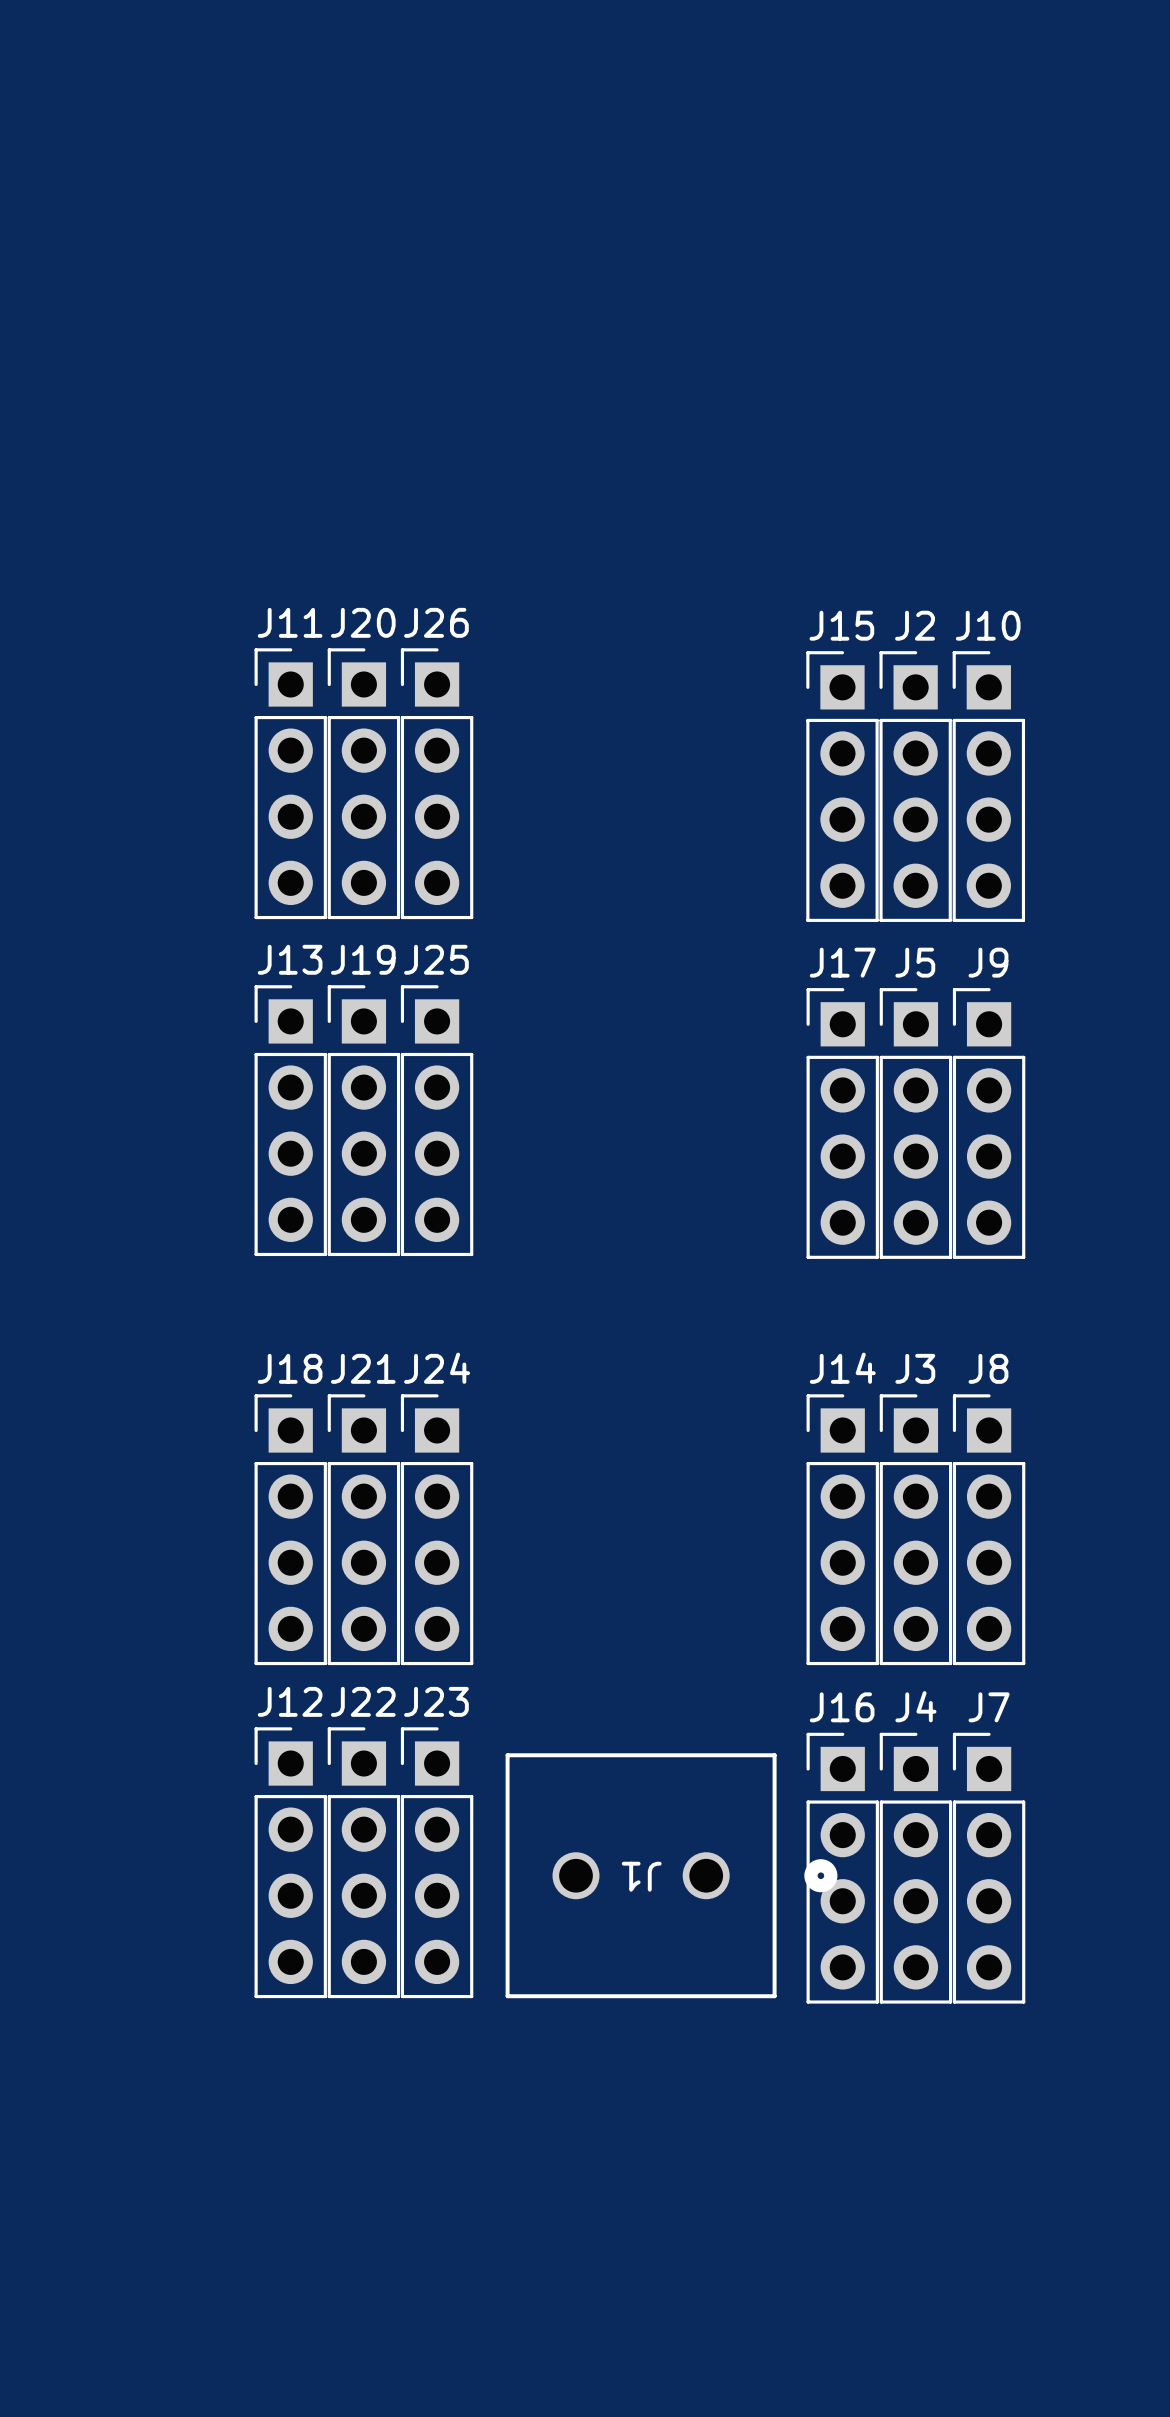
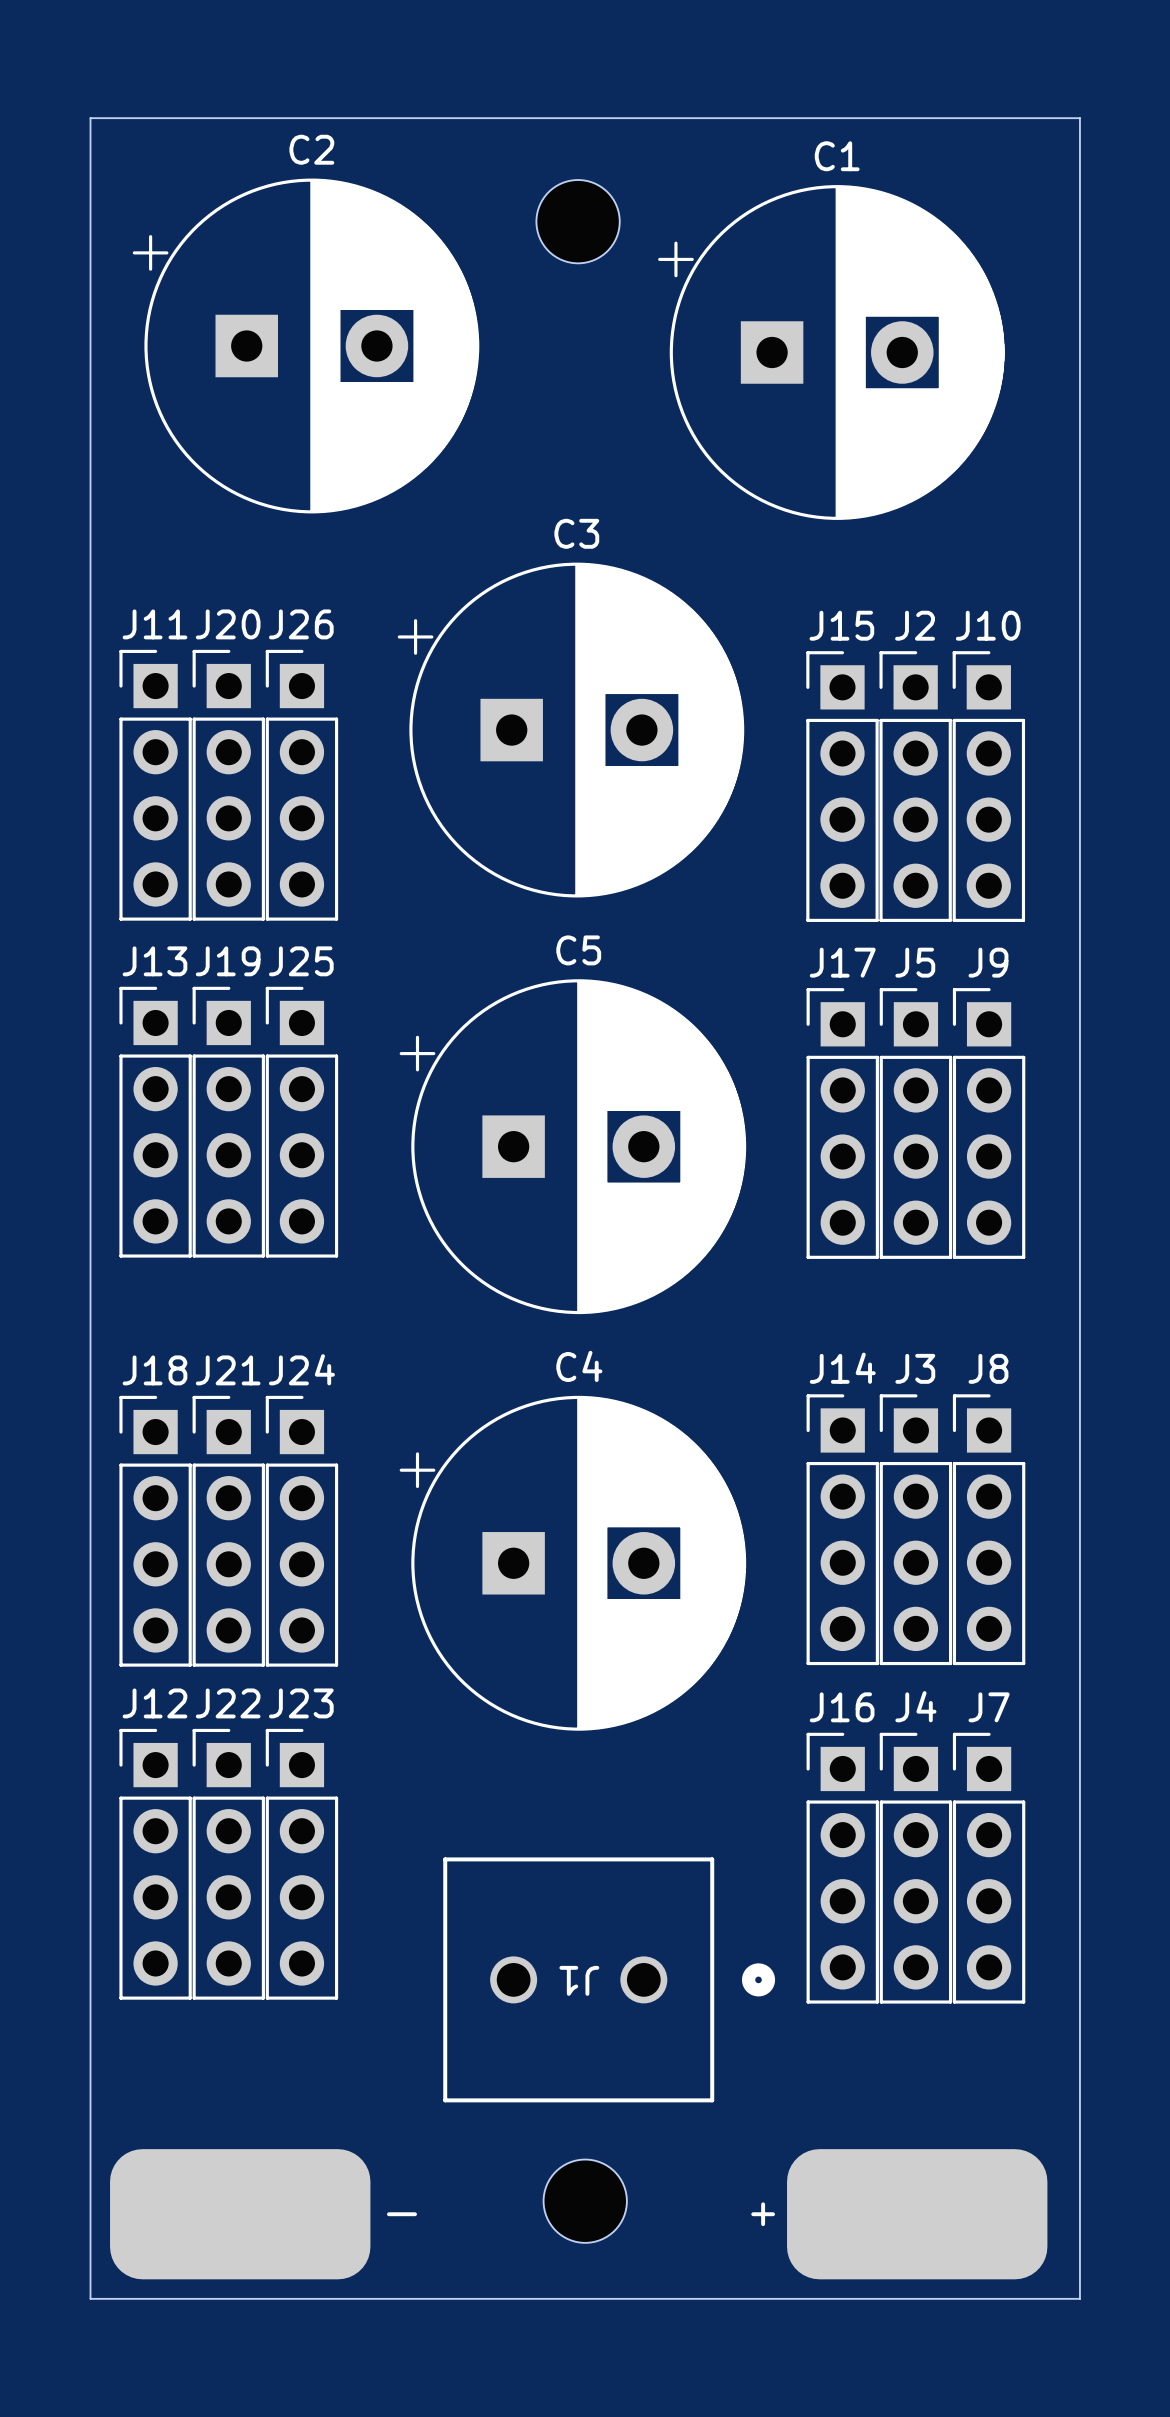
board edge: none -> (90, 118) (1079, 118) (1079, 2298) (90, 2298) (90, 118)
part: none -> (578, 221)
C2: none -> (306, 345)
C1: none -> (831, 352)
C3: none -> (570, 730)
J11 position: (290, 783) -> (155, 785)
J20 position: (363, 783) -> (228, 785)
J26 position: (437, 783) -> (301, 785)
J13 position: (290, 1120) -> (155, 1122)
J19 position: (363, 1120) -> (228, 1122)
J25 position: (437, 1120) -> (301, 1122)
C5: none -> (572, 1146)
J18 position: (290, 1529) -> (155, 1531)
J21 position: (363, 1529) -> (228, 1531)
J24 position: (437, 1529) -> (301, 1531)
C4: none -> (572, 1563)
J12 position: (290, 1862) -> (155, 1864)
J22 position: (363, 1862) -> (228, 1864)
J23 position: (437, 1862) -> (301, 1864)
J1 position: (671, 1875) -> (609, 1979)
part: none -> (585, 2201)
I: none -> (240, 2214)
part: none -> (917, 2214)

